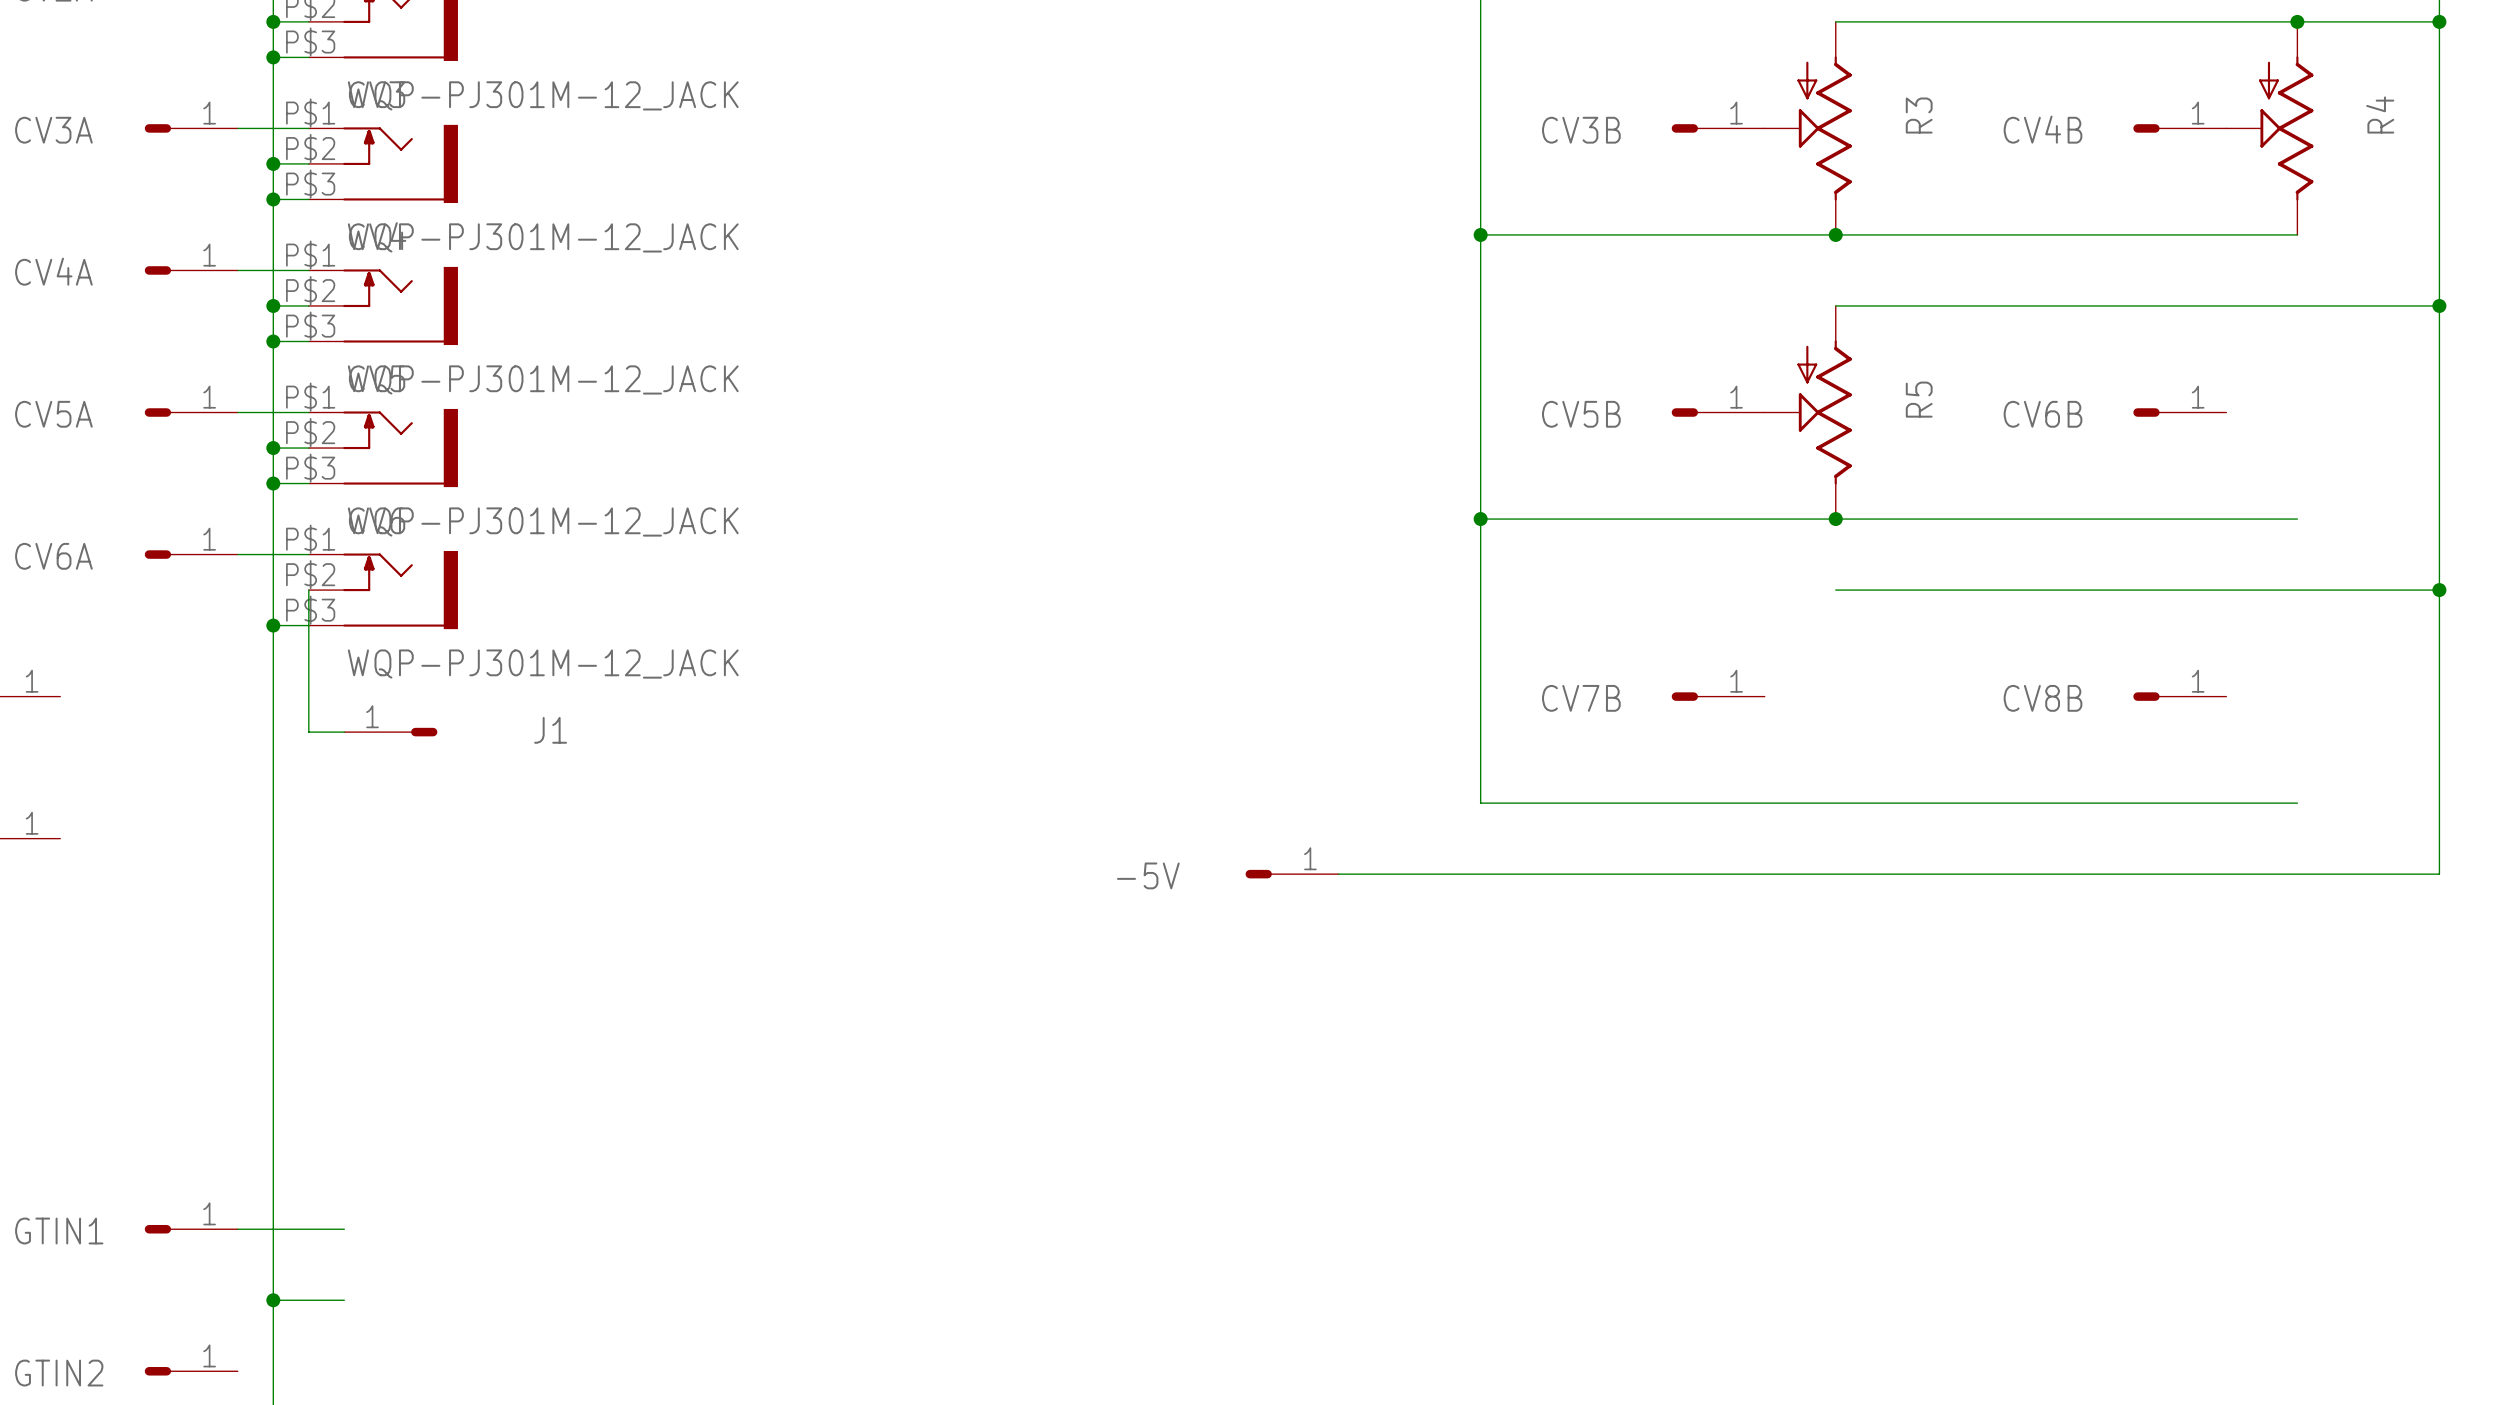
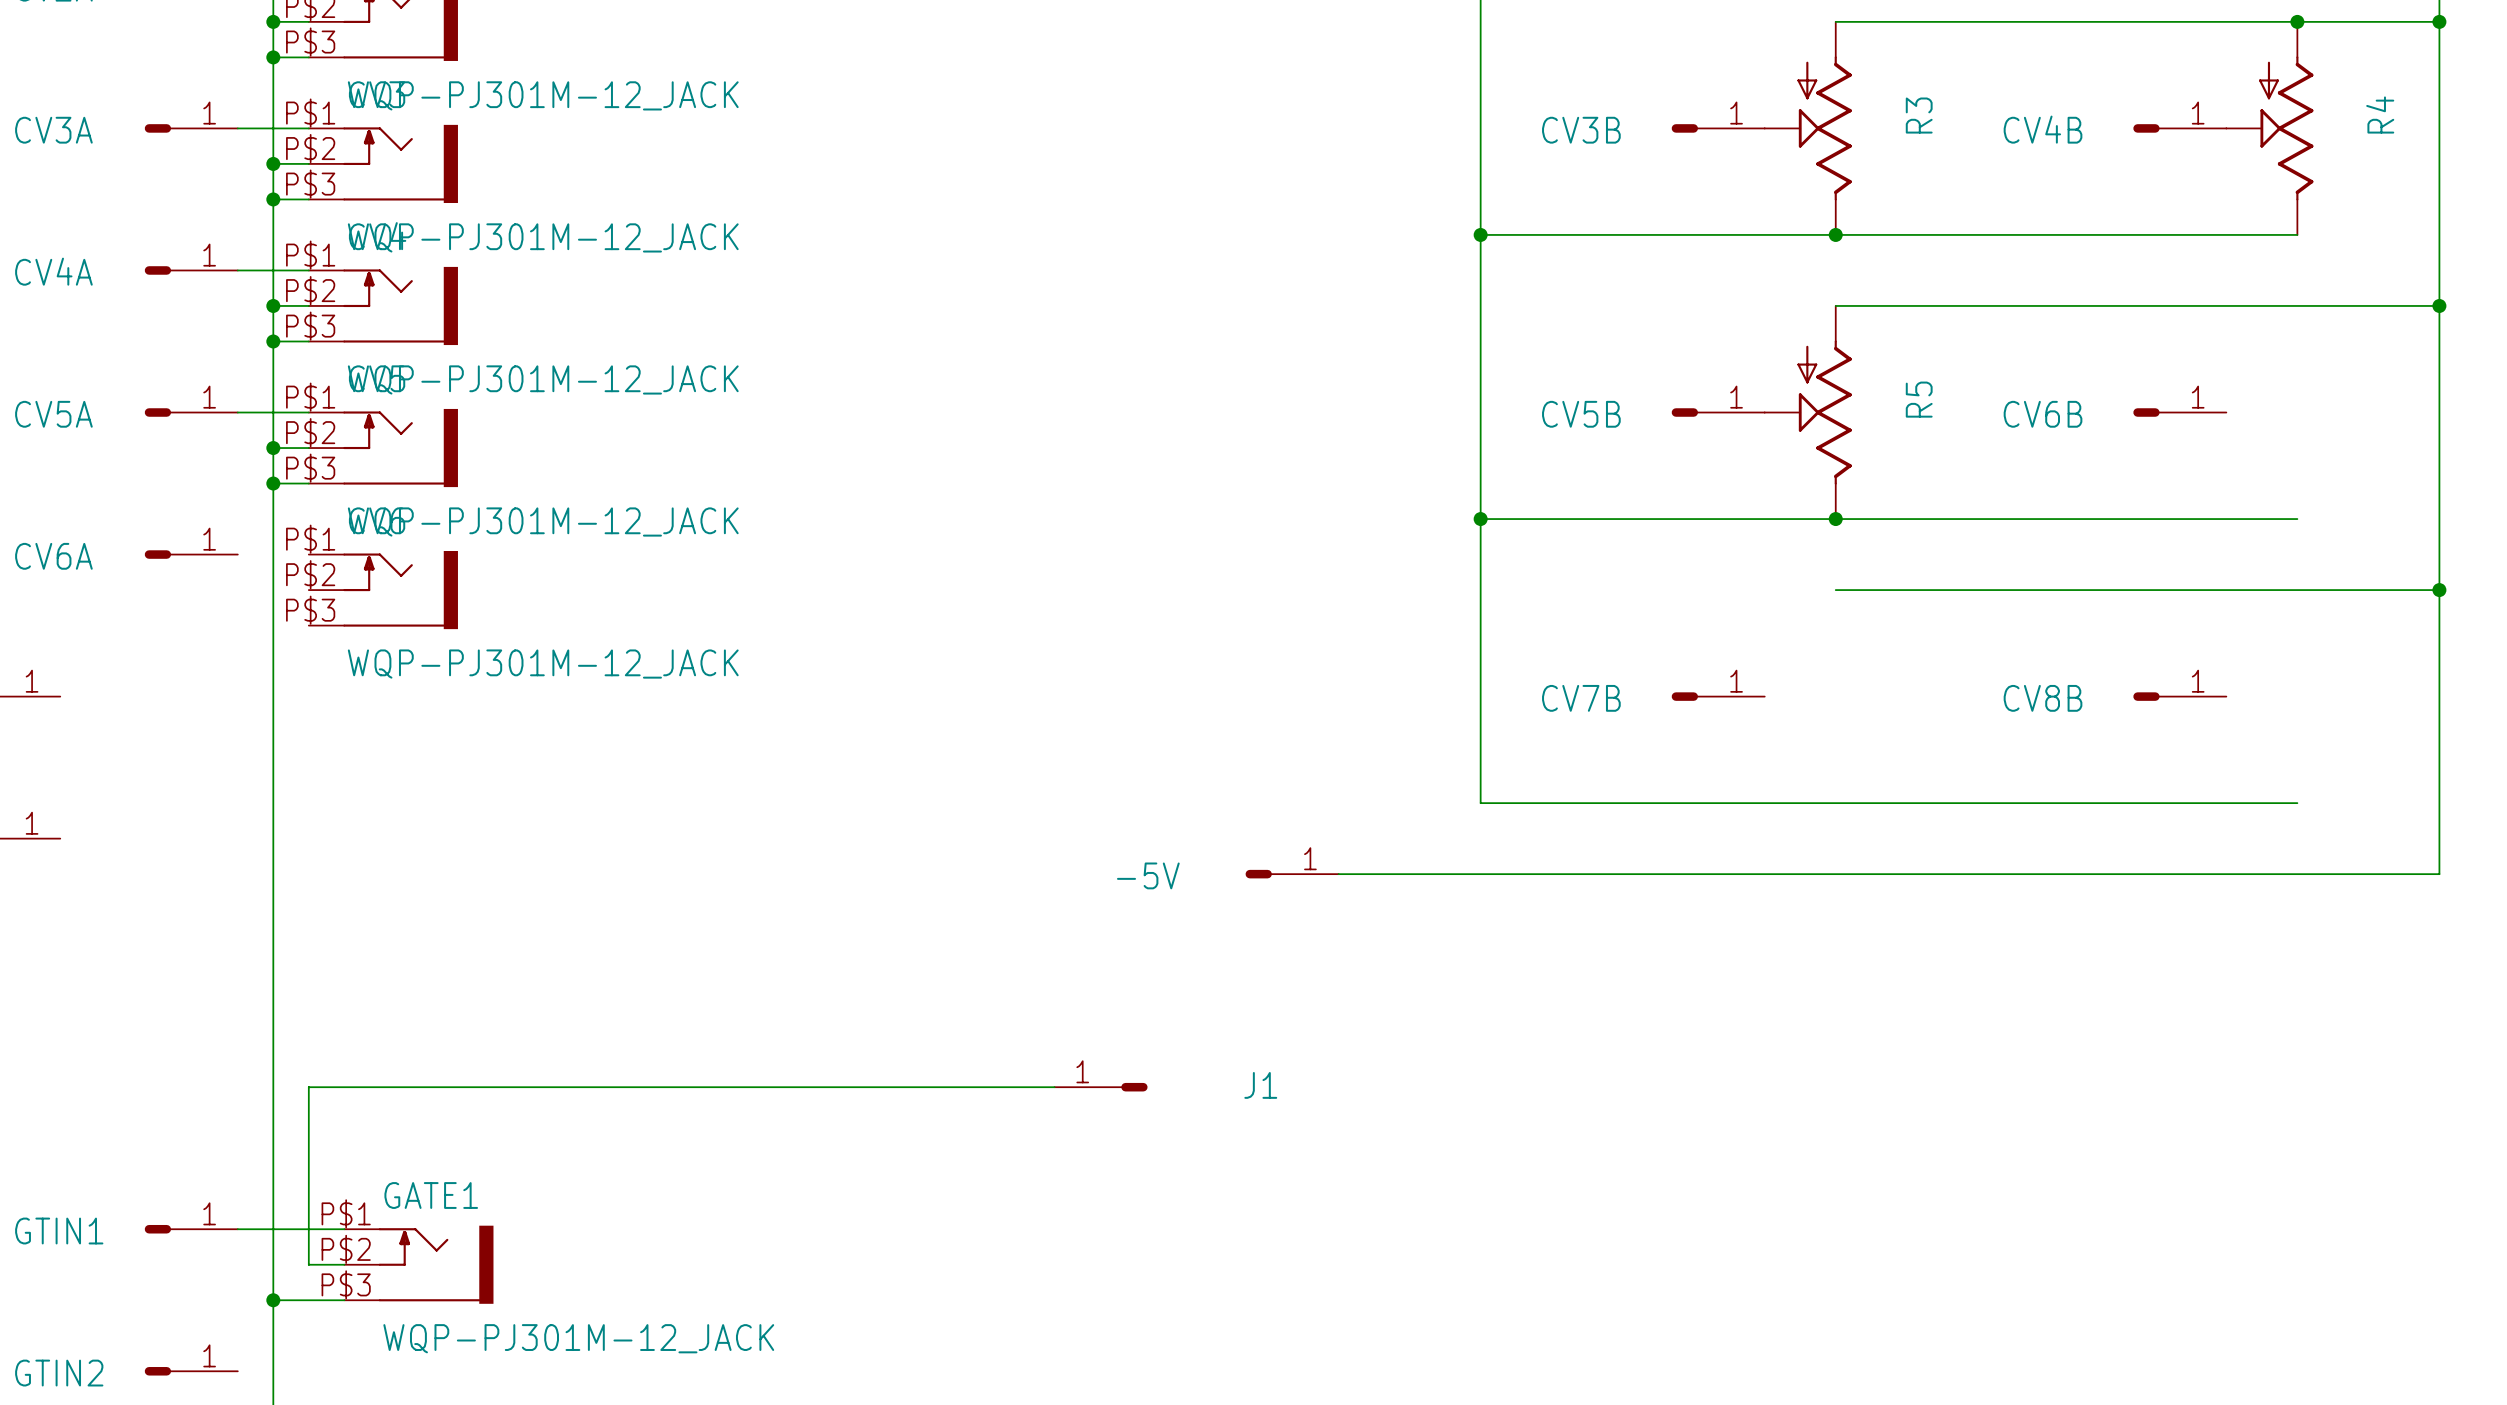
wire: (237, 554) (308, 554) -> none
wire: (308, 590) (308, 732) (344, 732) -> none
wire: (273, 625) (308, 625) -> none
junction: (273, 625) -> none
J1 position: (390, 732) -> (1101, 1087)
wire: none -> (1054, 1087) (308, 1087) (308, 1264) (344, 1264)
GATE1: none -> WQP-PJ301M-12_JACK (418, 1264)

